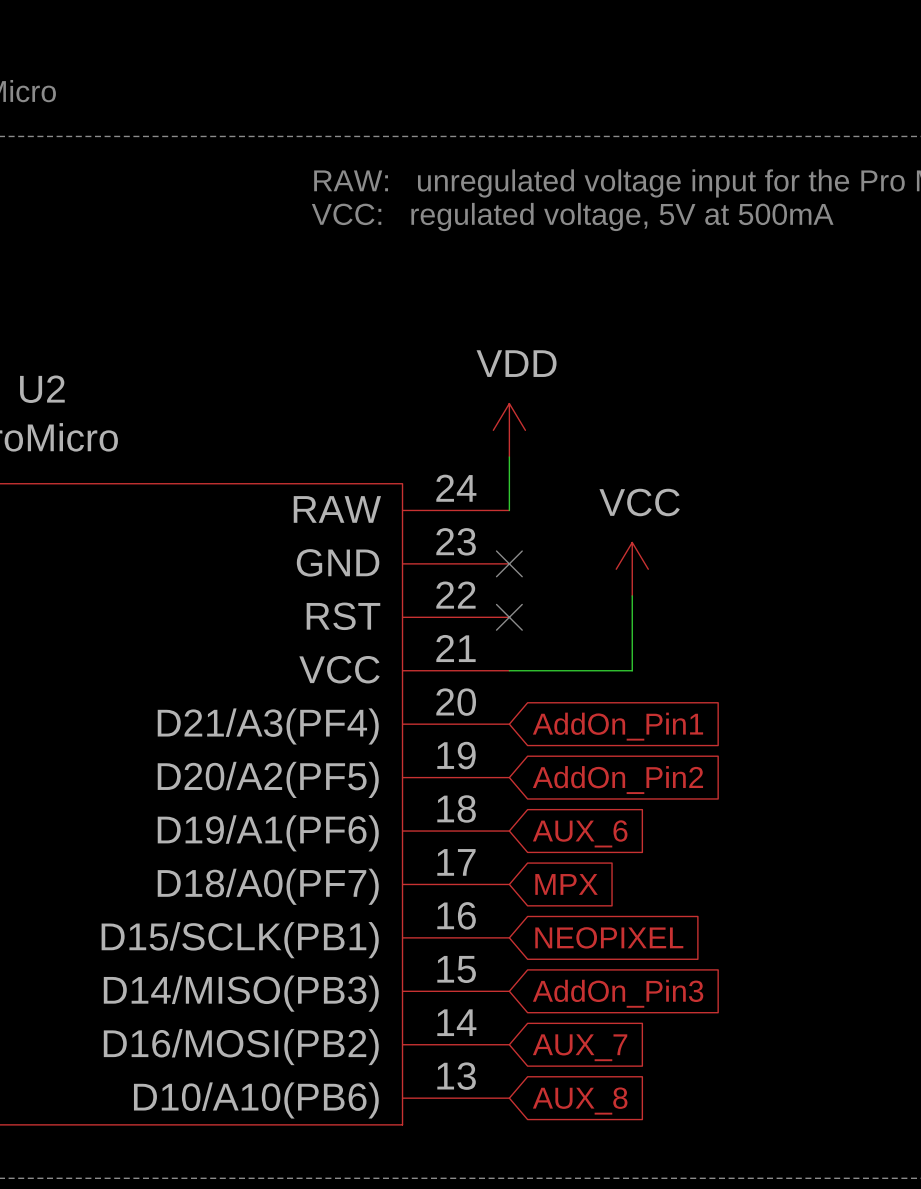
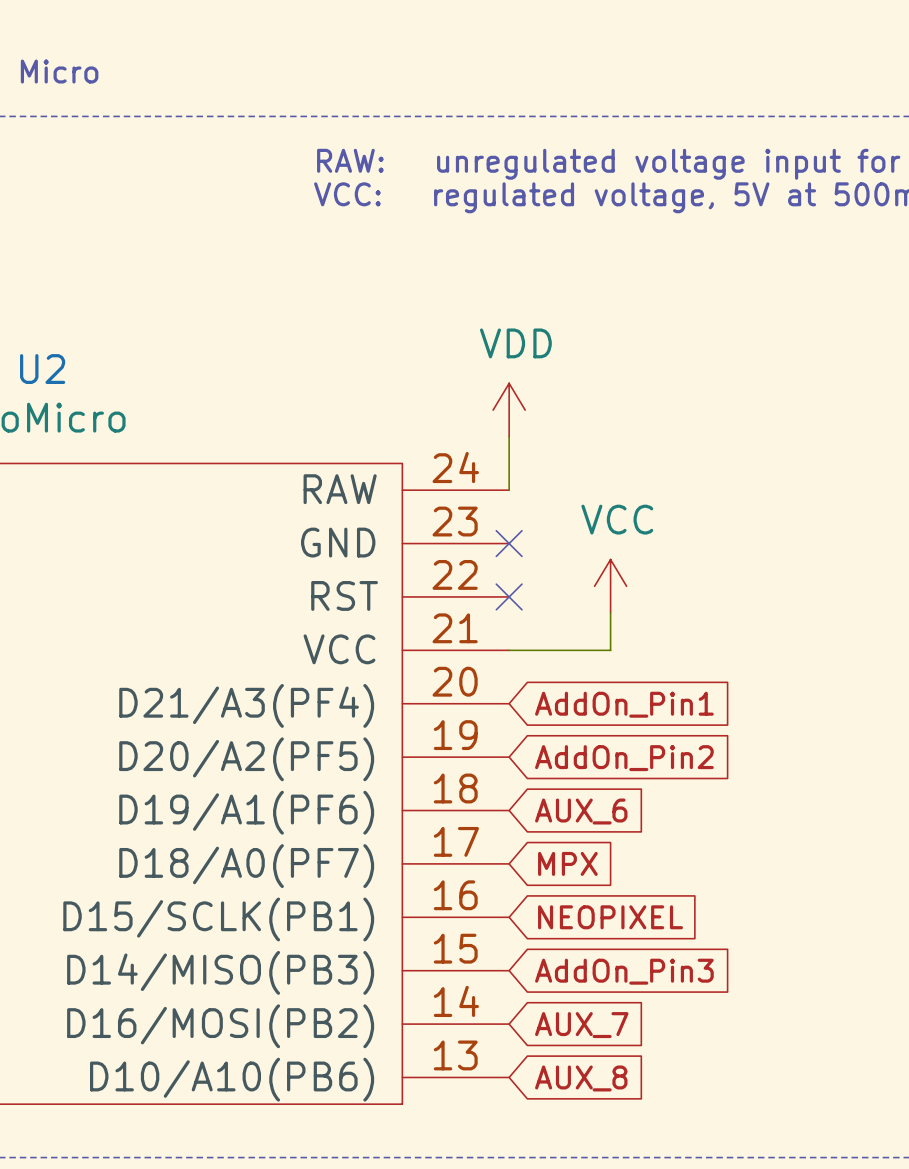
power symbol position: VCC (632, 569) -> VCC (610, 586)
wire: (632, 595) (632, 670) (610, 670) -> (610, 612) (610, 650)

